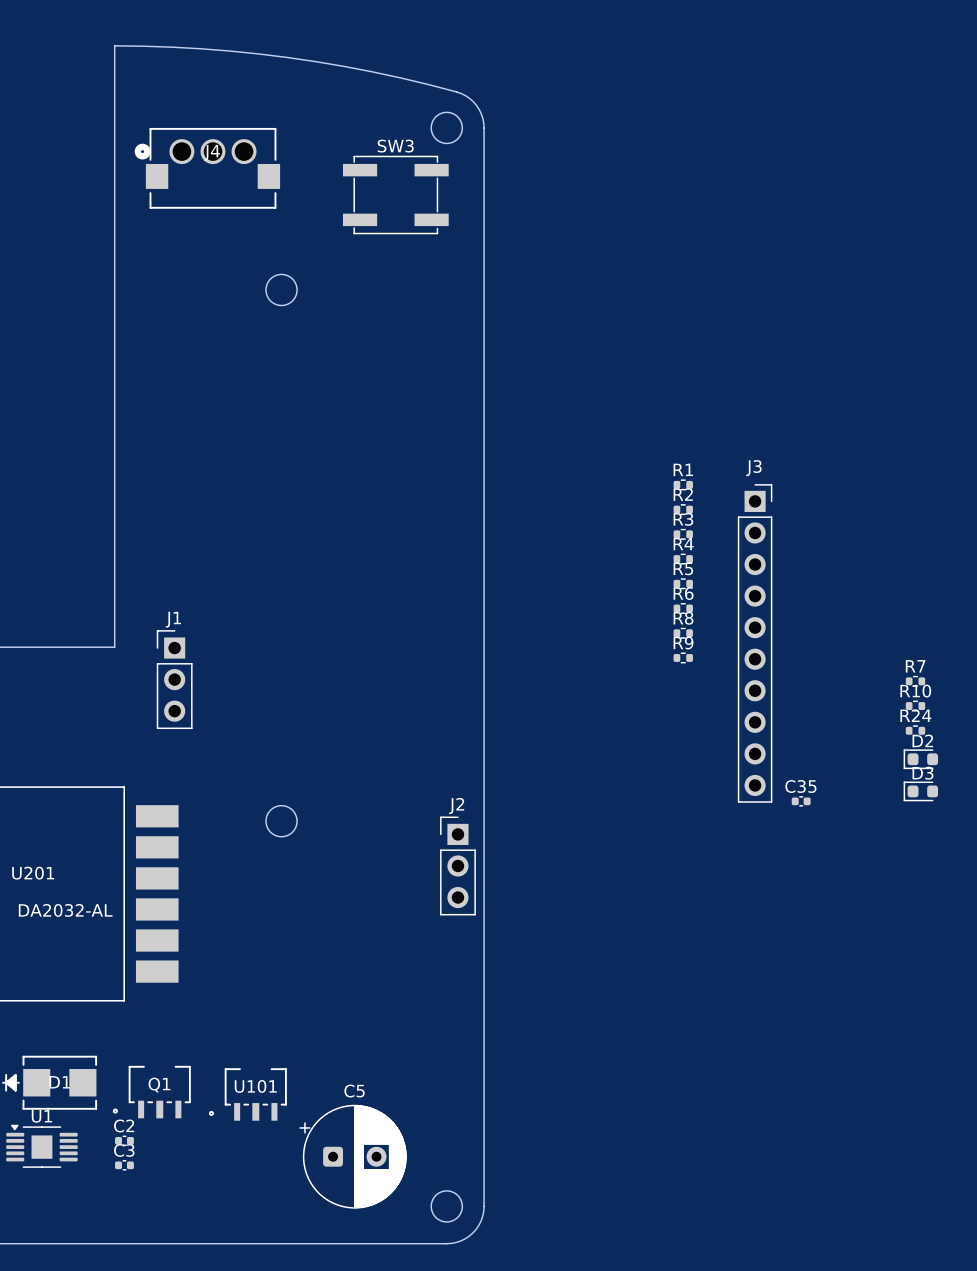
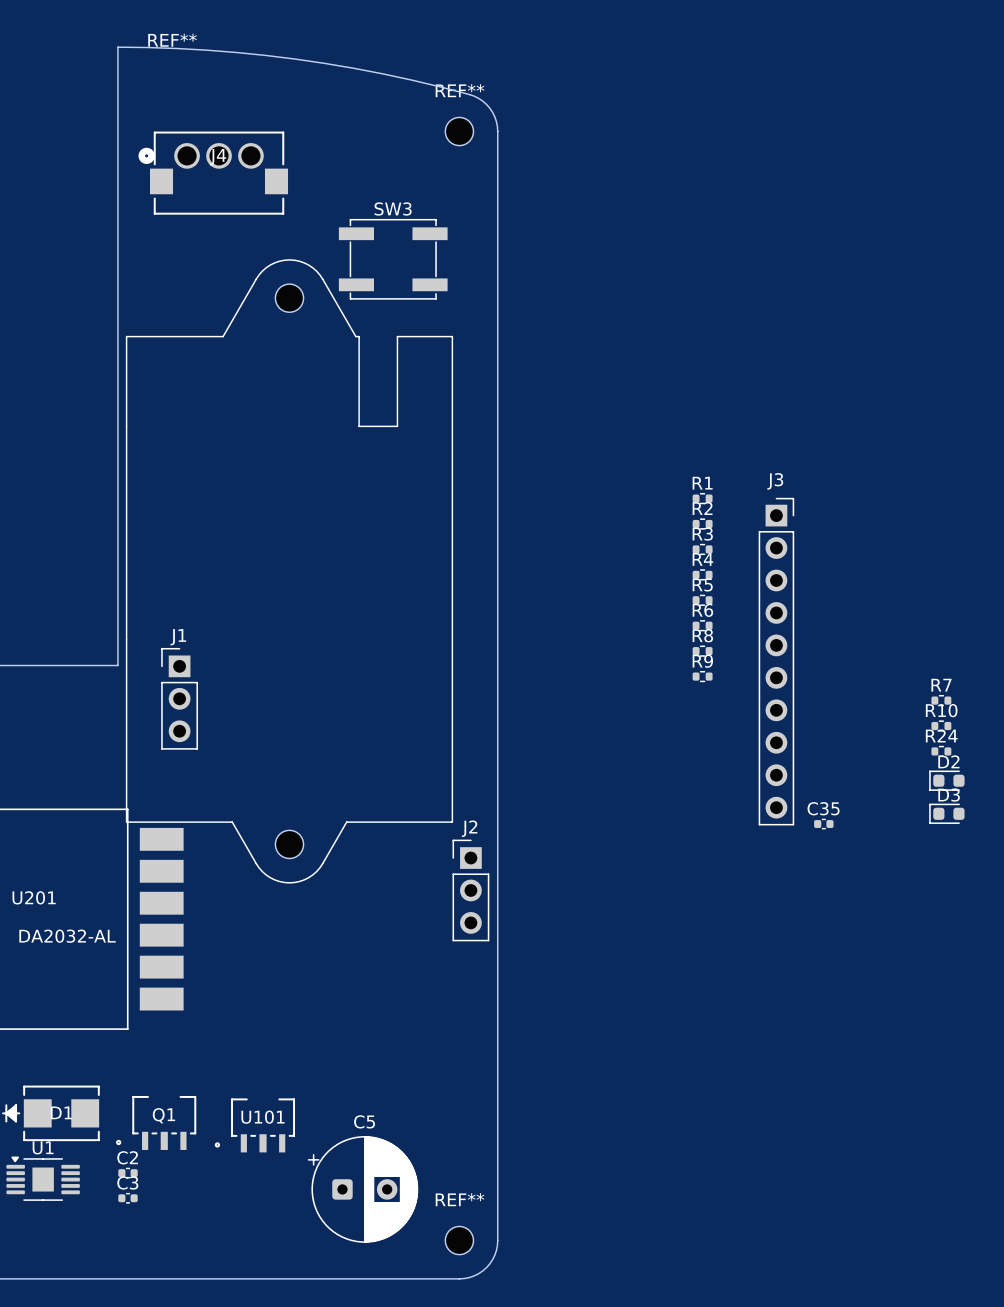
round board edge: [430, 111, 463, 145] -> none
REF**: none -> (459, 131)
SW3 position: (395, 195) -> (393, 259)
round board edge: [265, 273, 298, 307] -> none
REF**: none -> (289, 571)
round board edge: [265, 805, 298, 838] -> none
round board edge: [430, 1190, 463, 1223] -> none
REF**: none -> (459, 1240)

